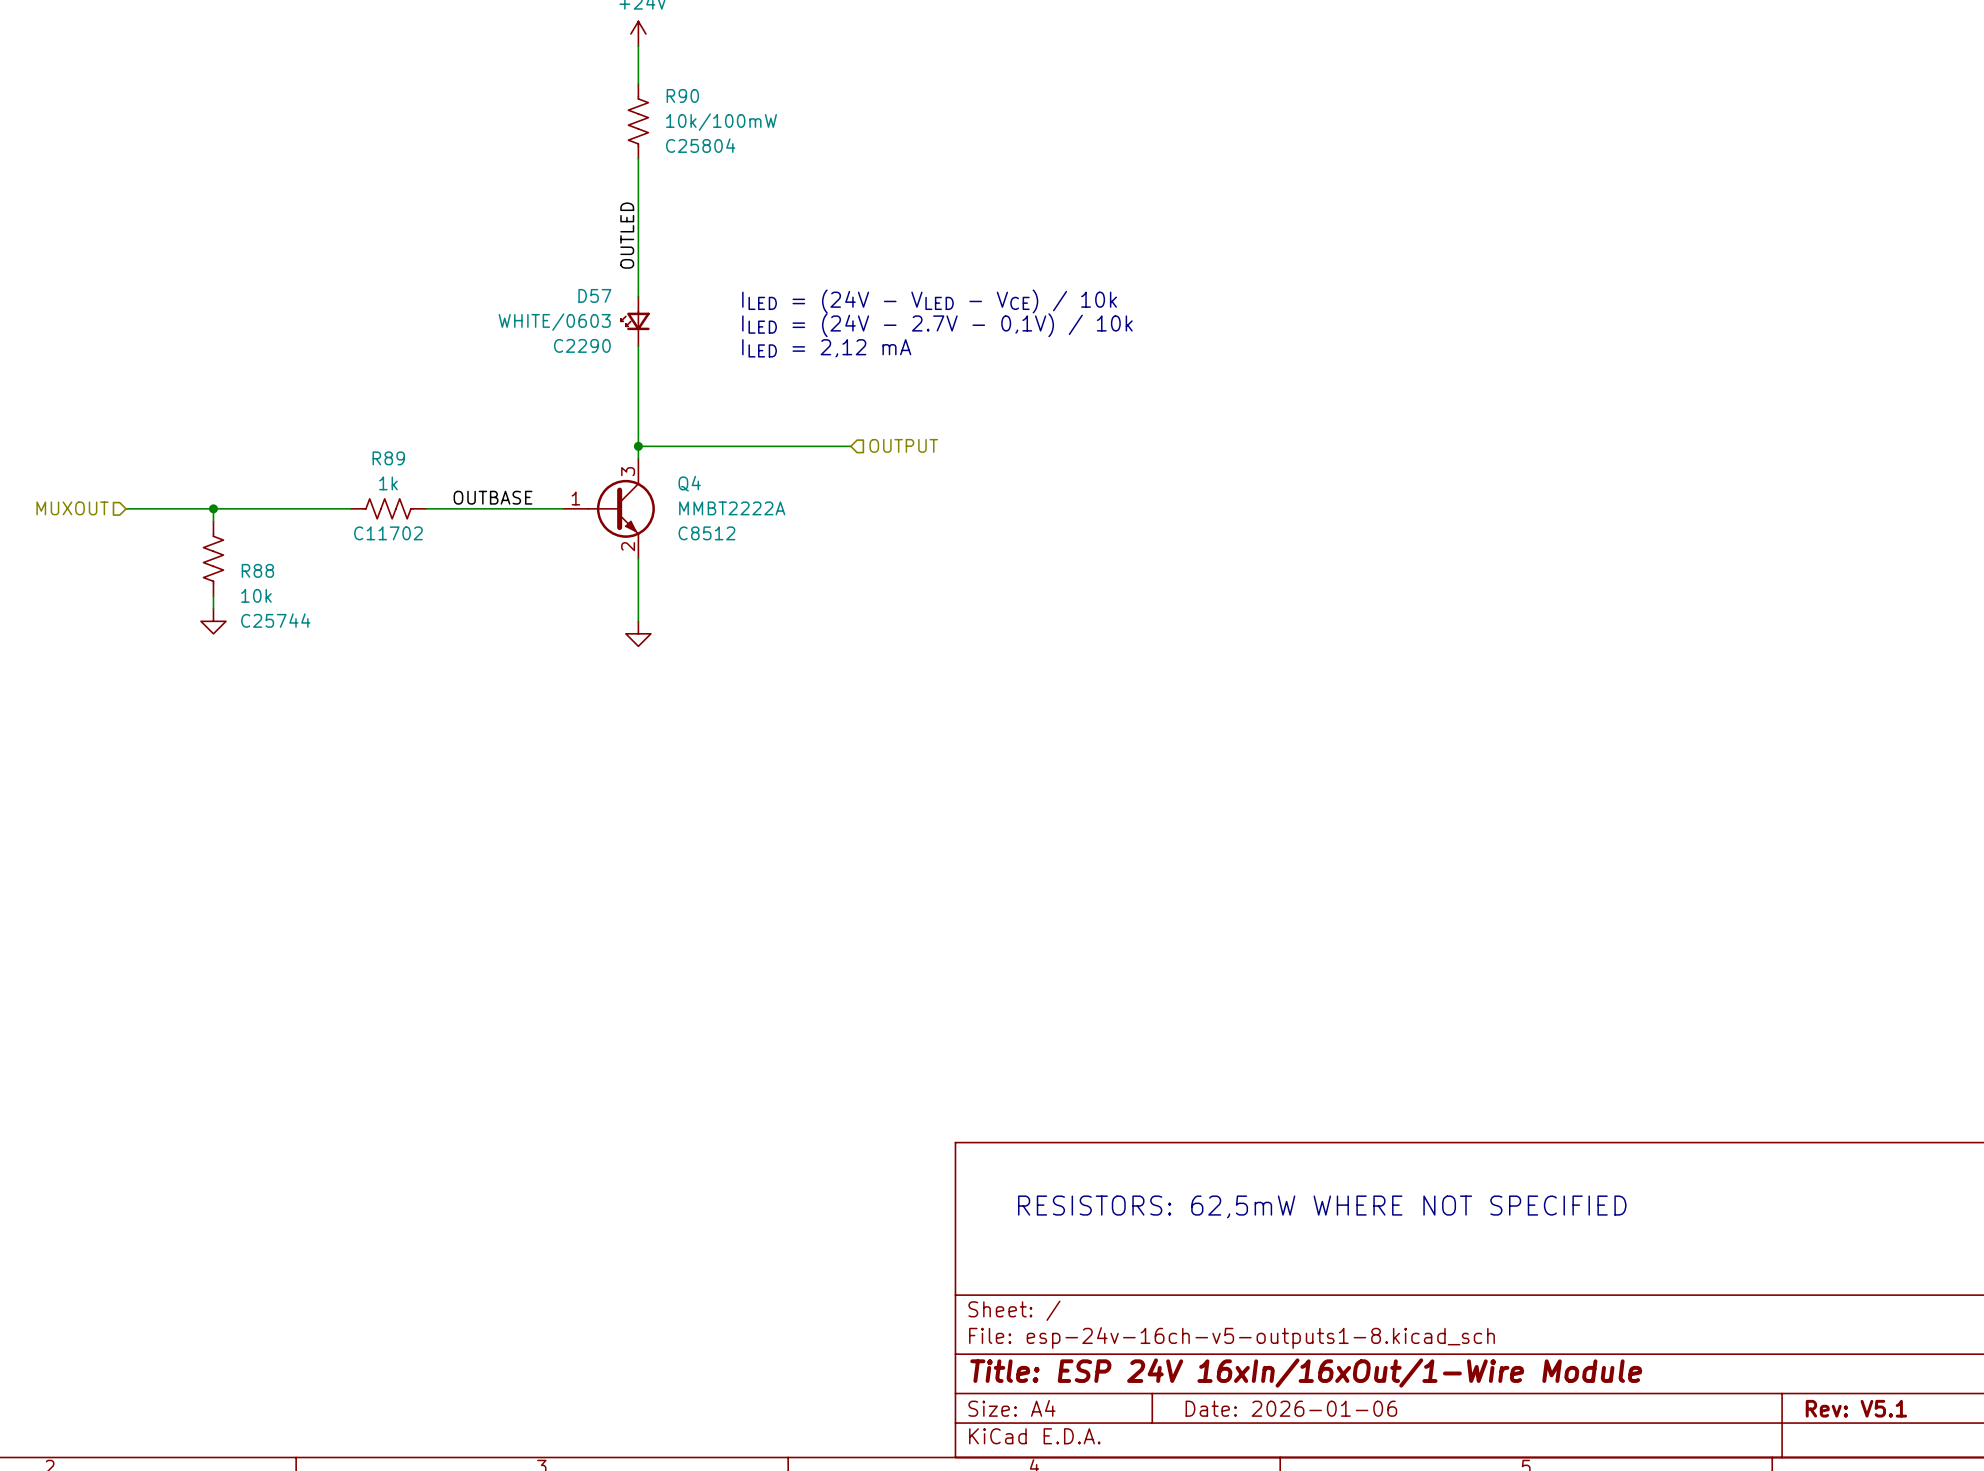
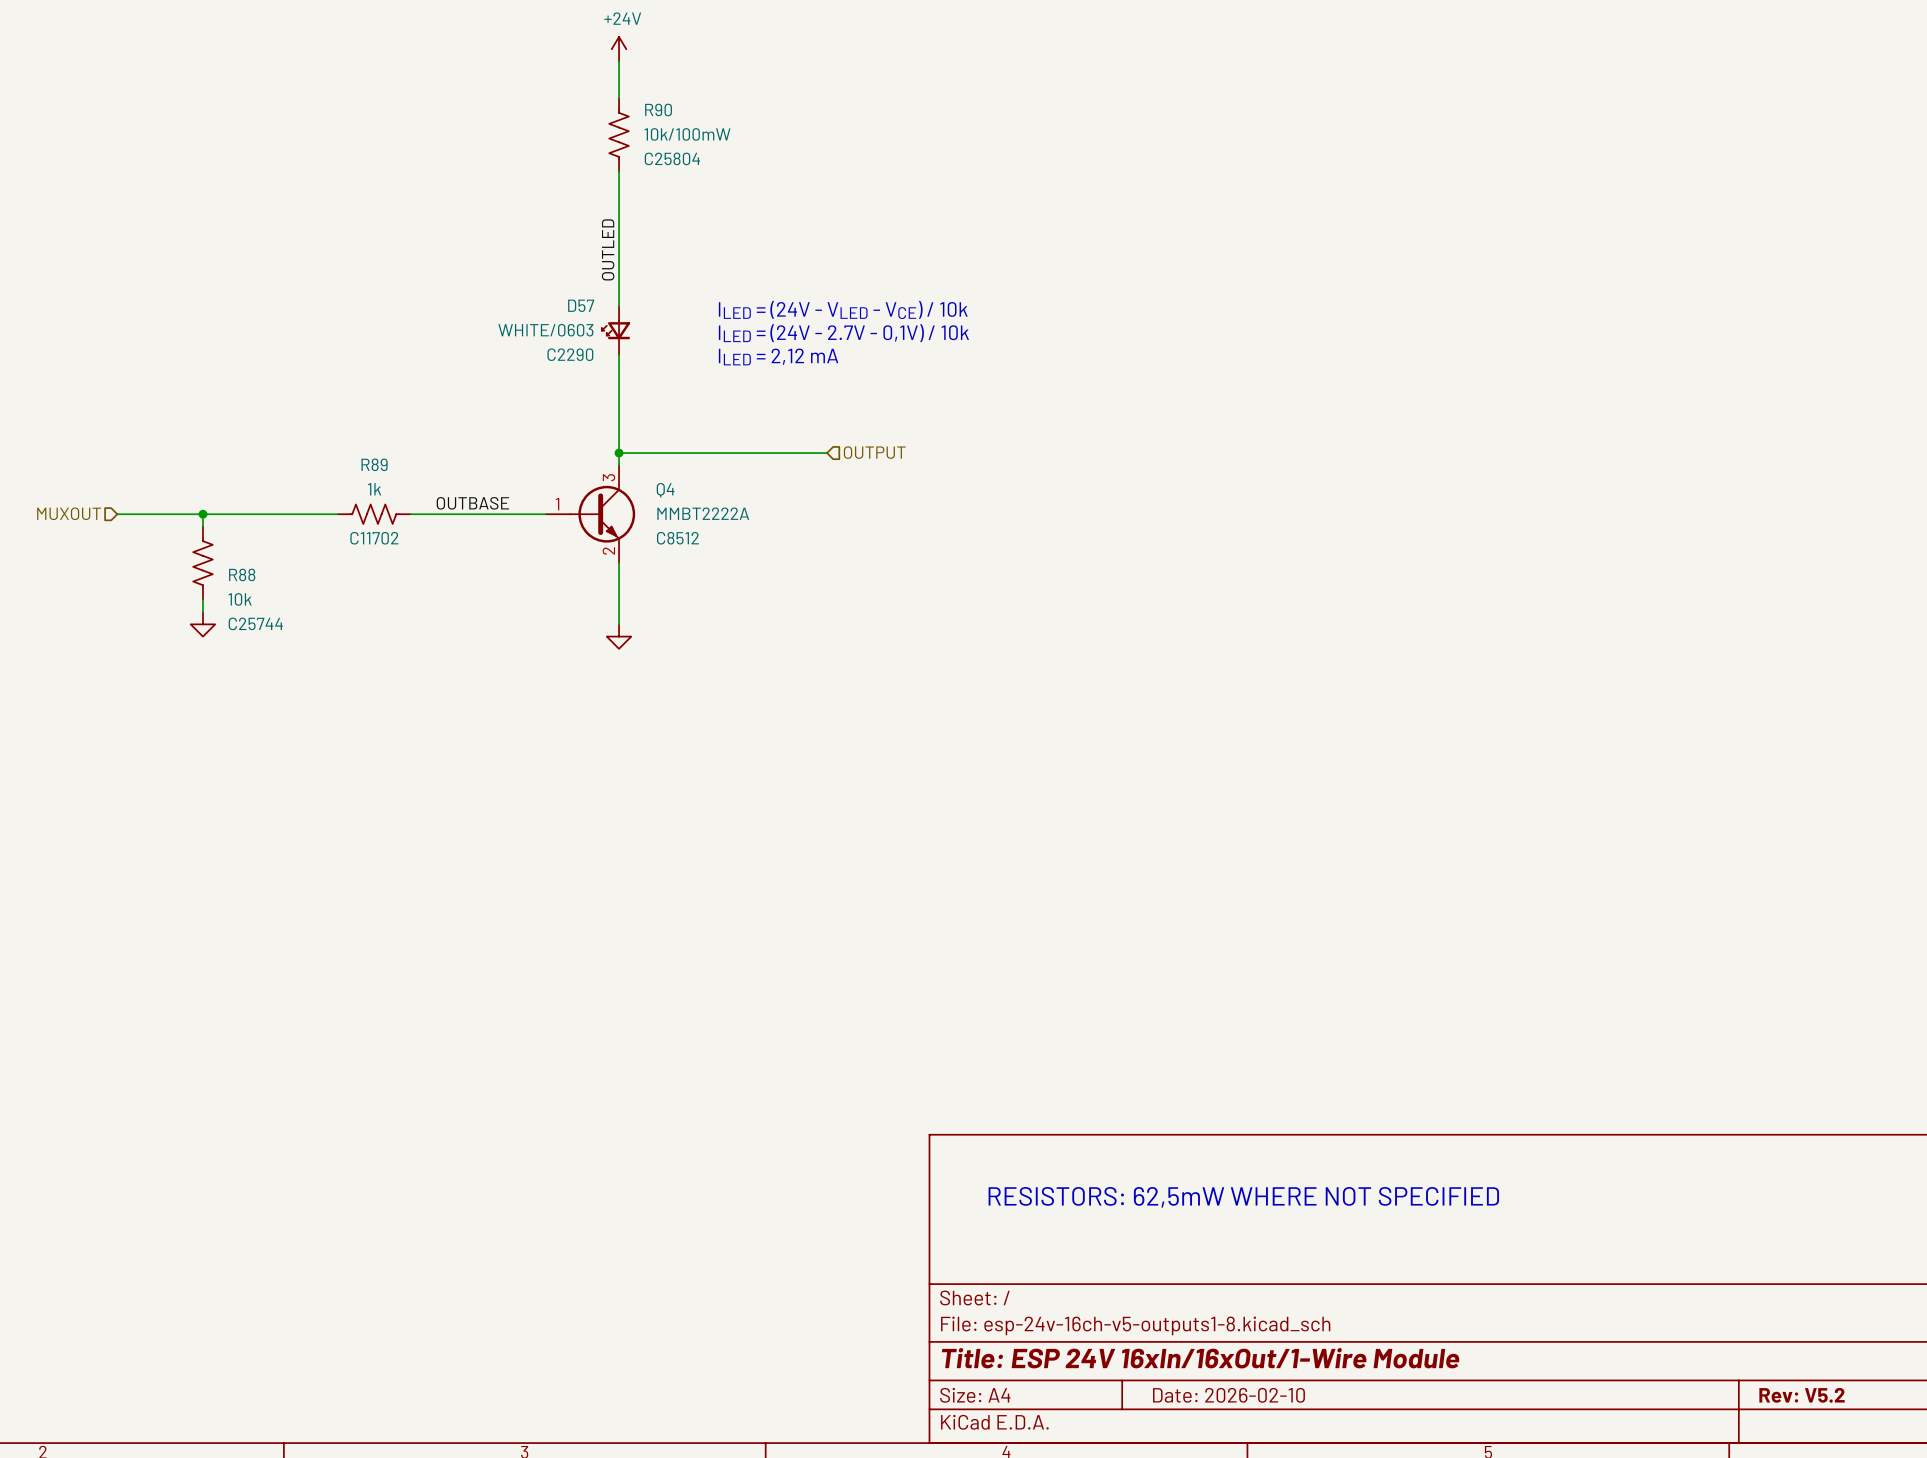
title block: Date: 2026-01-06 (1291, 1408) -> Date: 2026-02-10 (1228, 1395)
title block: Rev: V5.1 (1856, 1408) -> Rev: V5.2 (1802, 1395)

